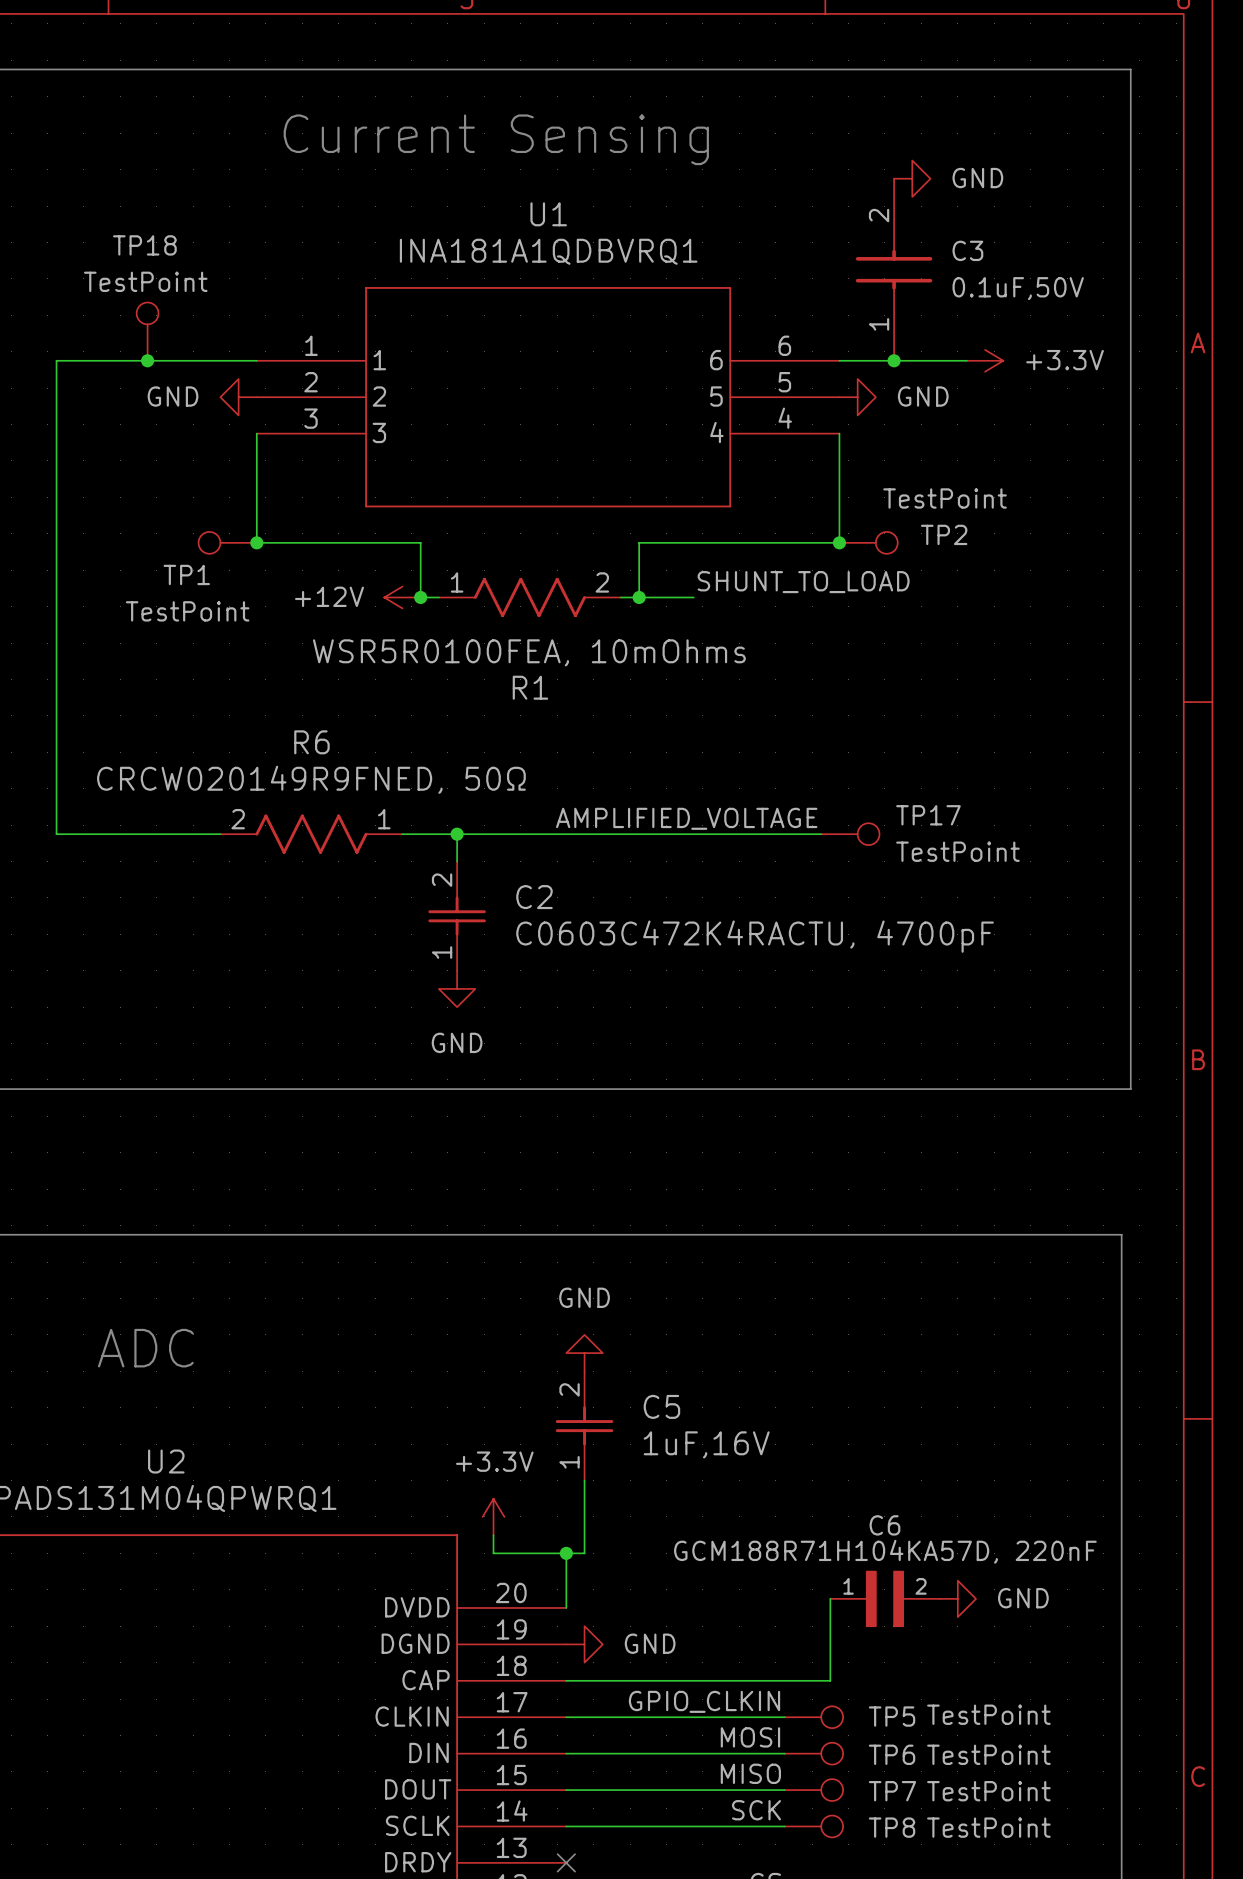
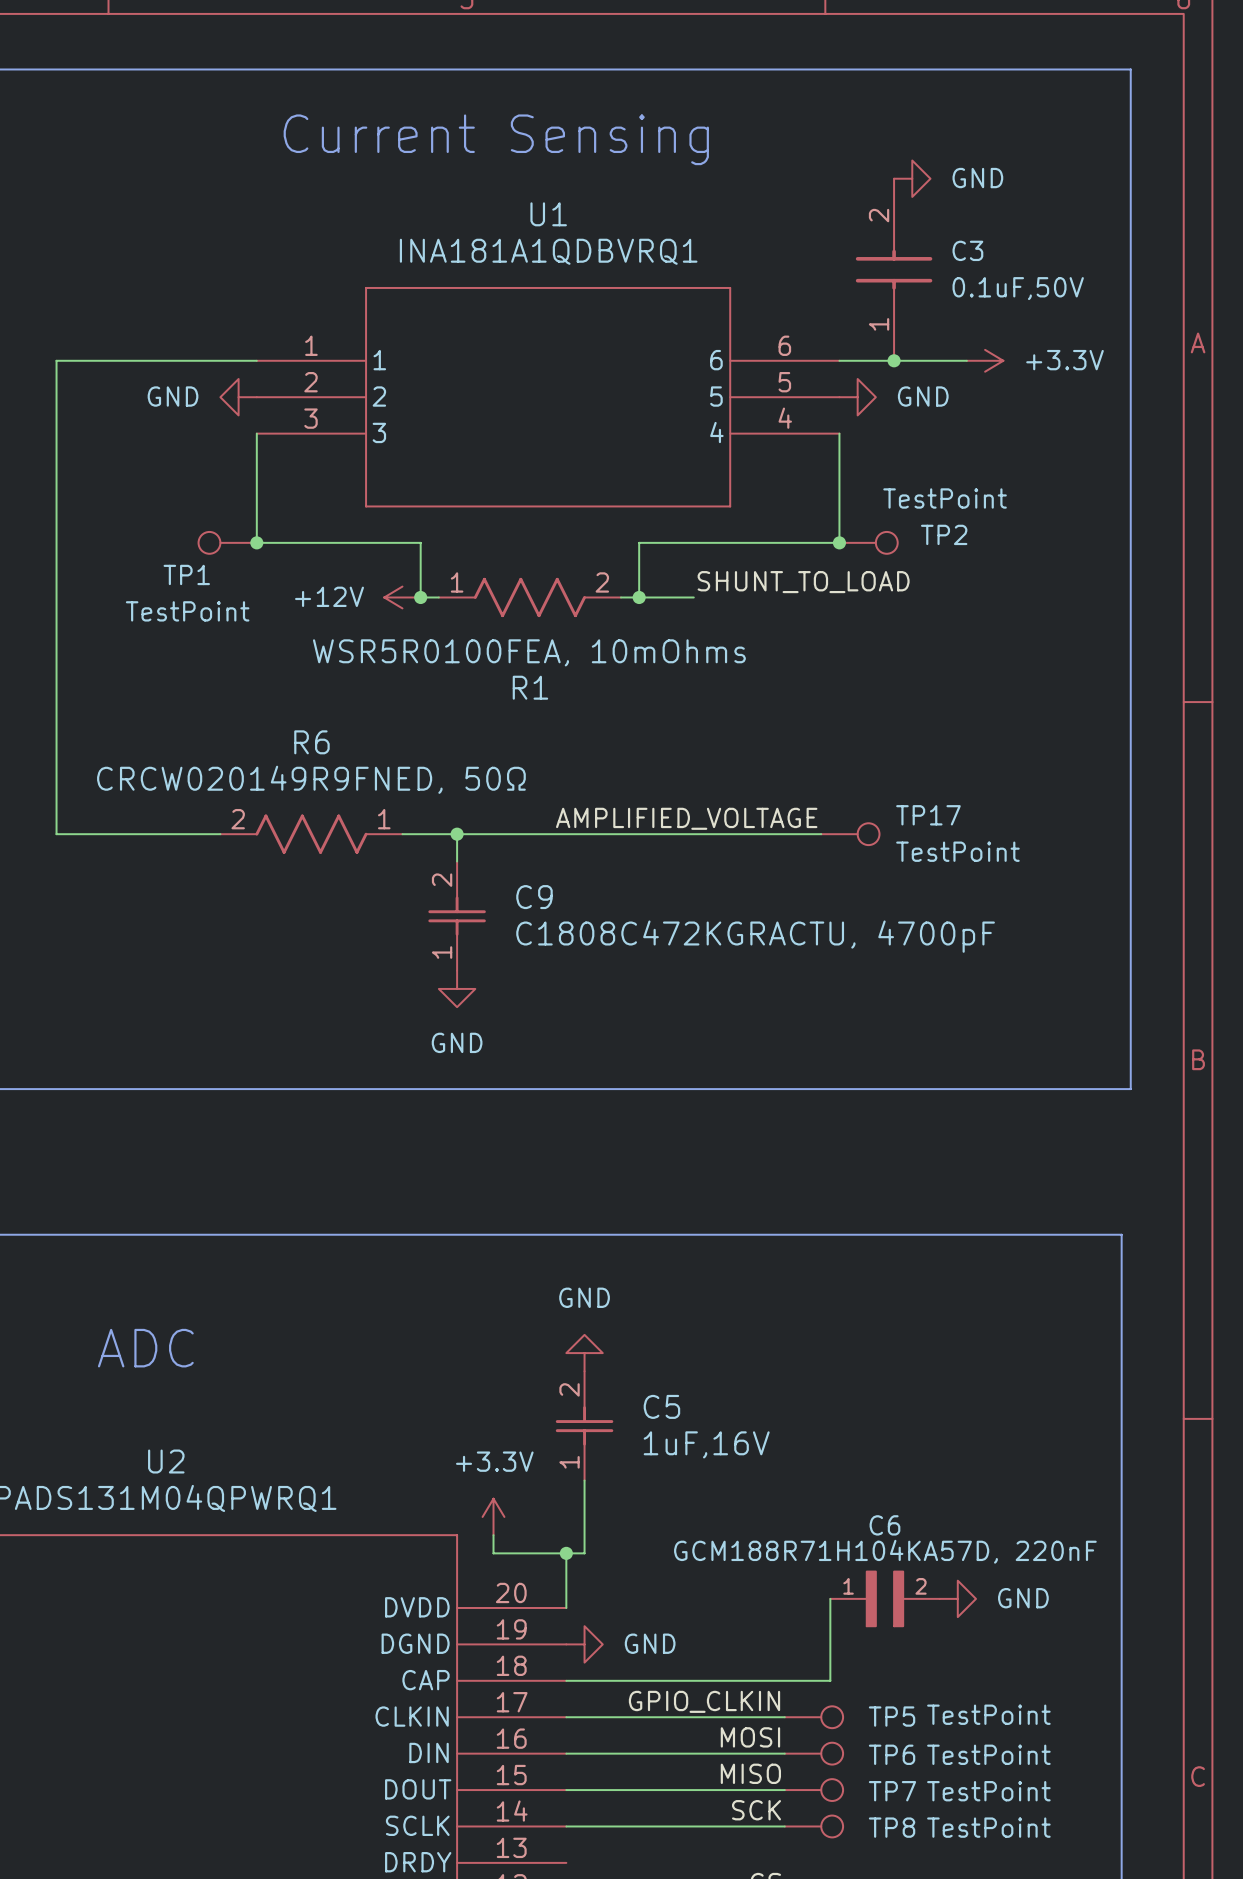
TP18: TestPoint (147, 331) -> none
junction: (147, 360) -> none
C2 name: C2 (534, 897) -> C9 (534, 897)
C2 value: C0603C472K4RACTU, 4700pF (755, 936) -> C1808C472KGRACTU, 4700pF (755, 936)
no-connect mark: (566, 1862) -> none

